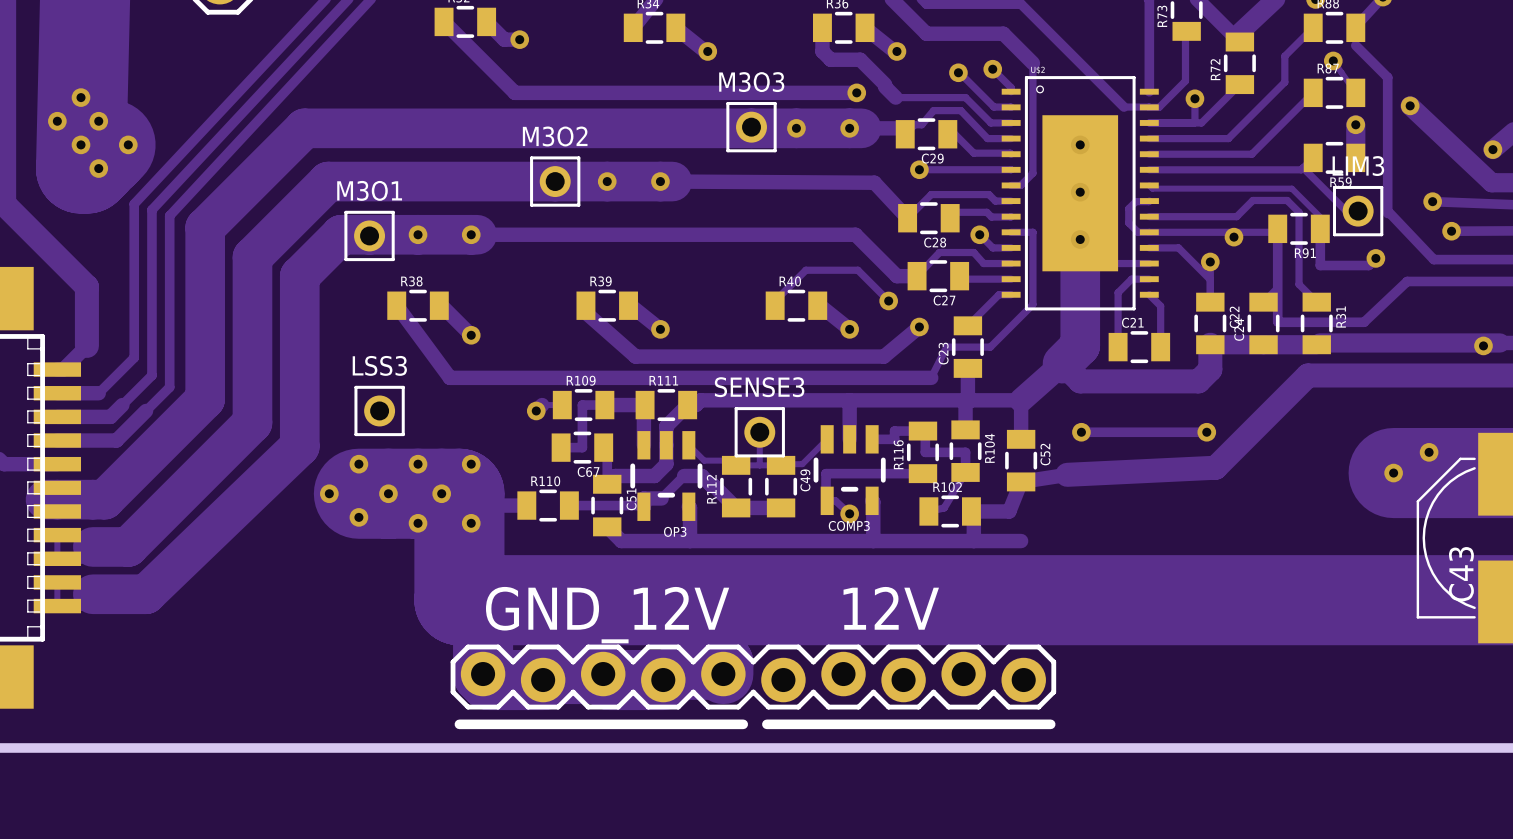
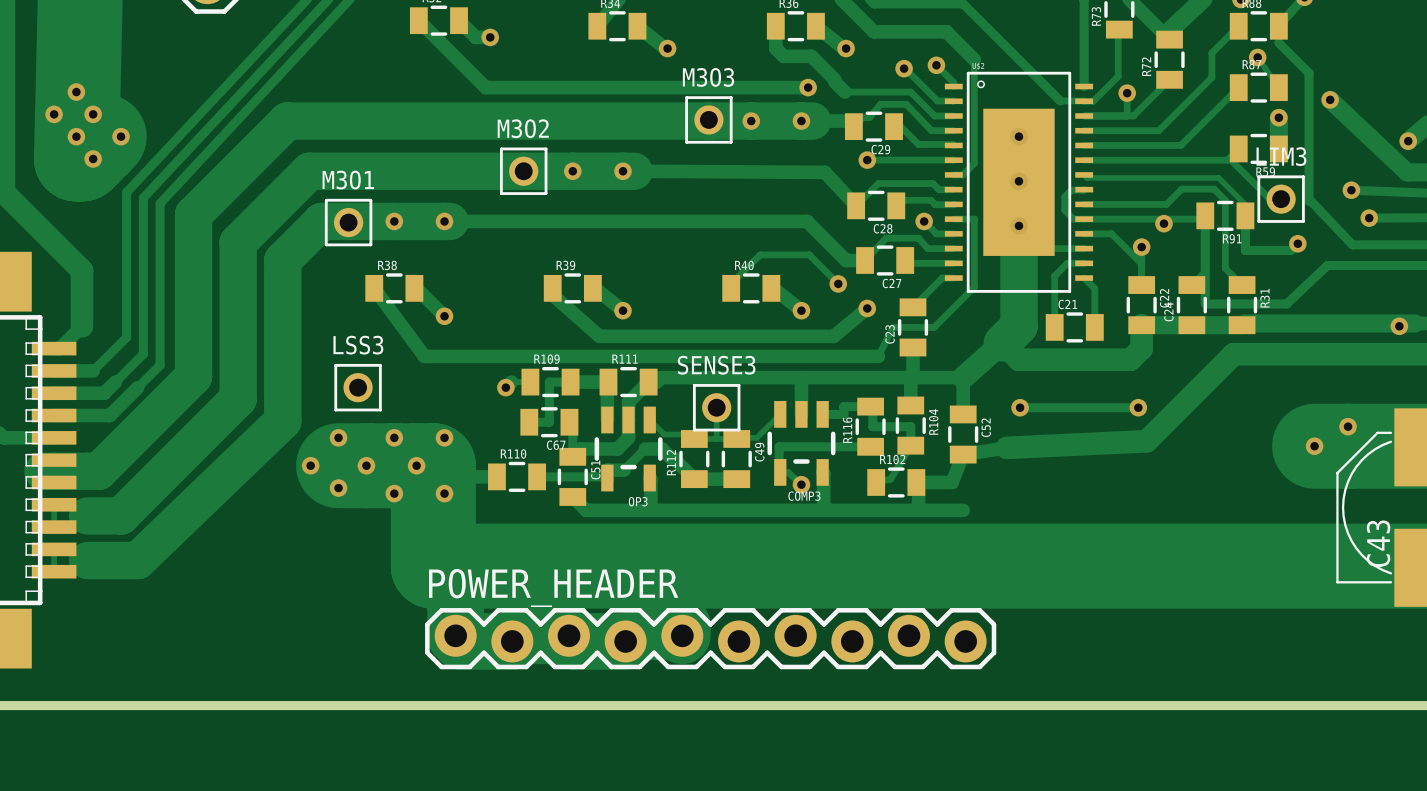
text: 12V (891, 608) -> none
text: GND_12V (607, 615) -> none
POWER_HEADER name: none -> POWER_HEADER (553, 587)
line: (459, 724) (743, 724) -> none
line: (766, 724) (1050, 724) -> none

